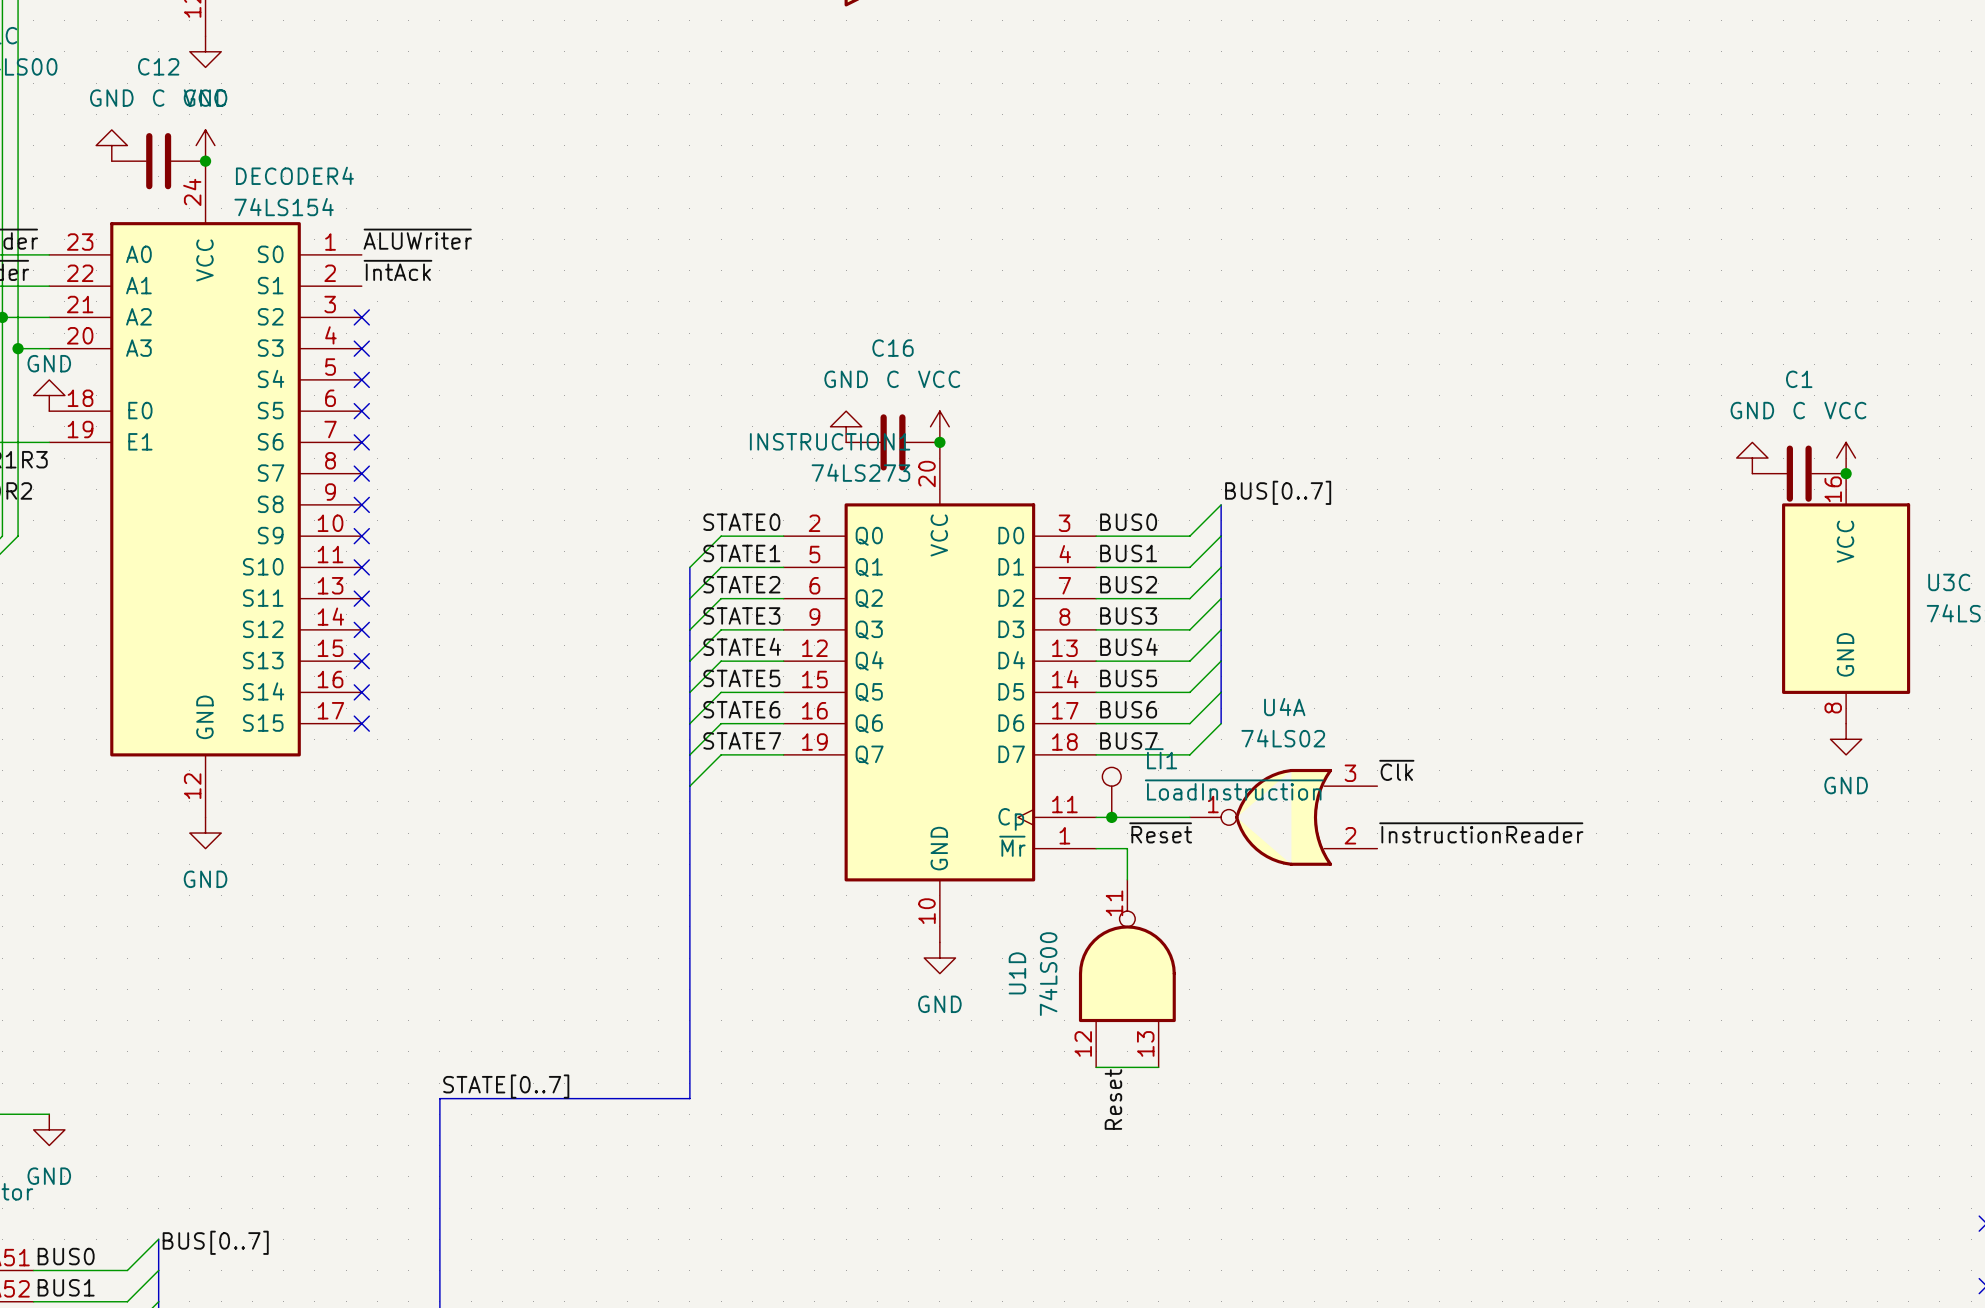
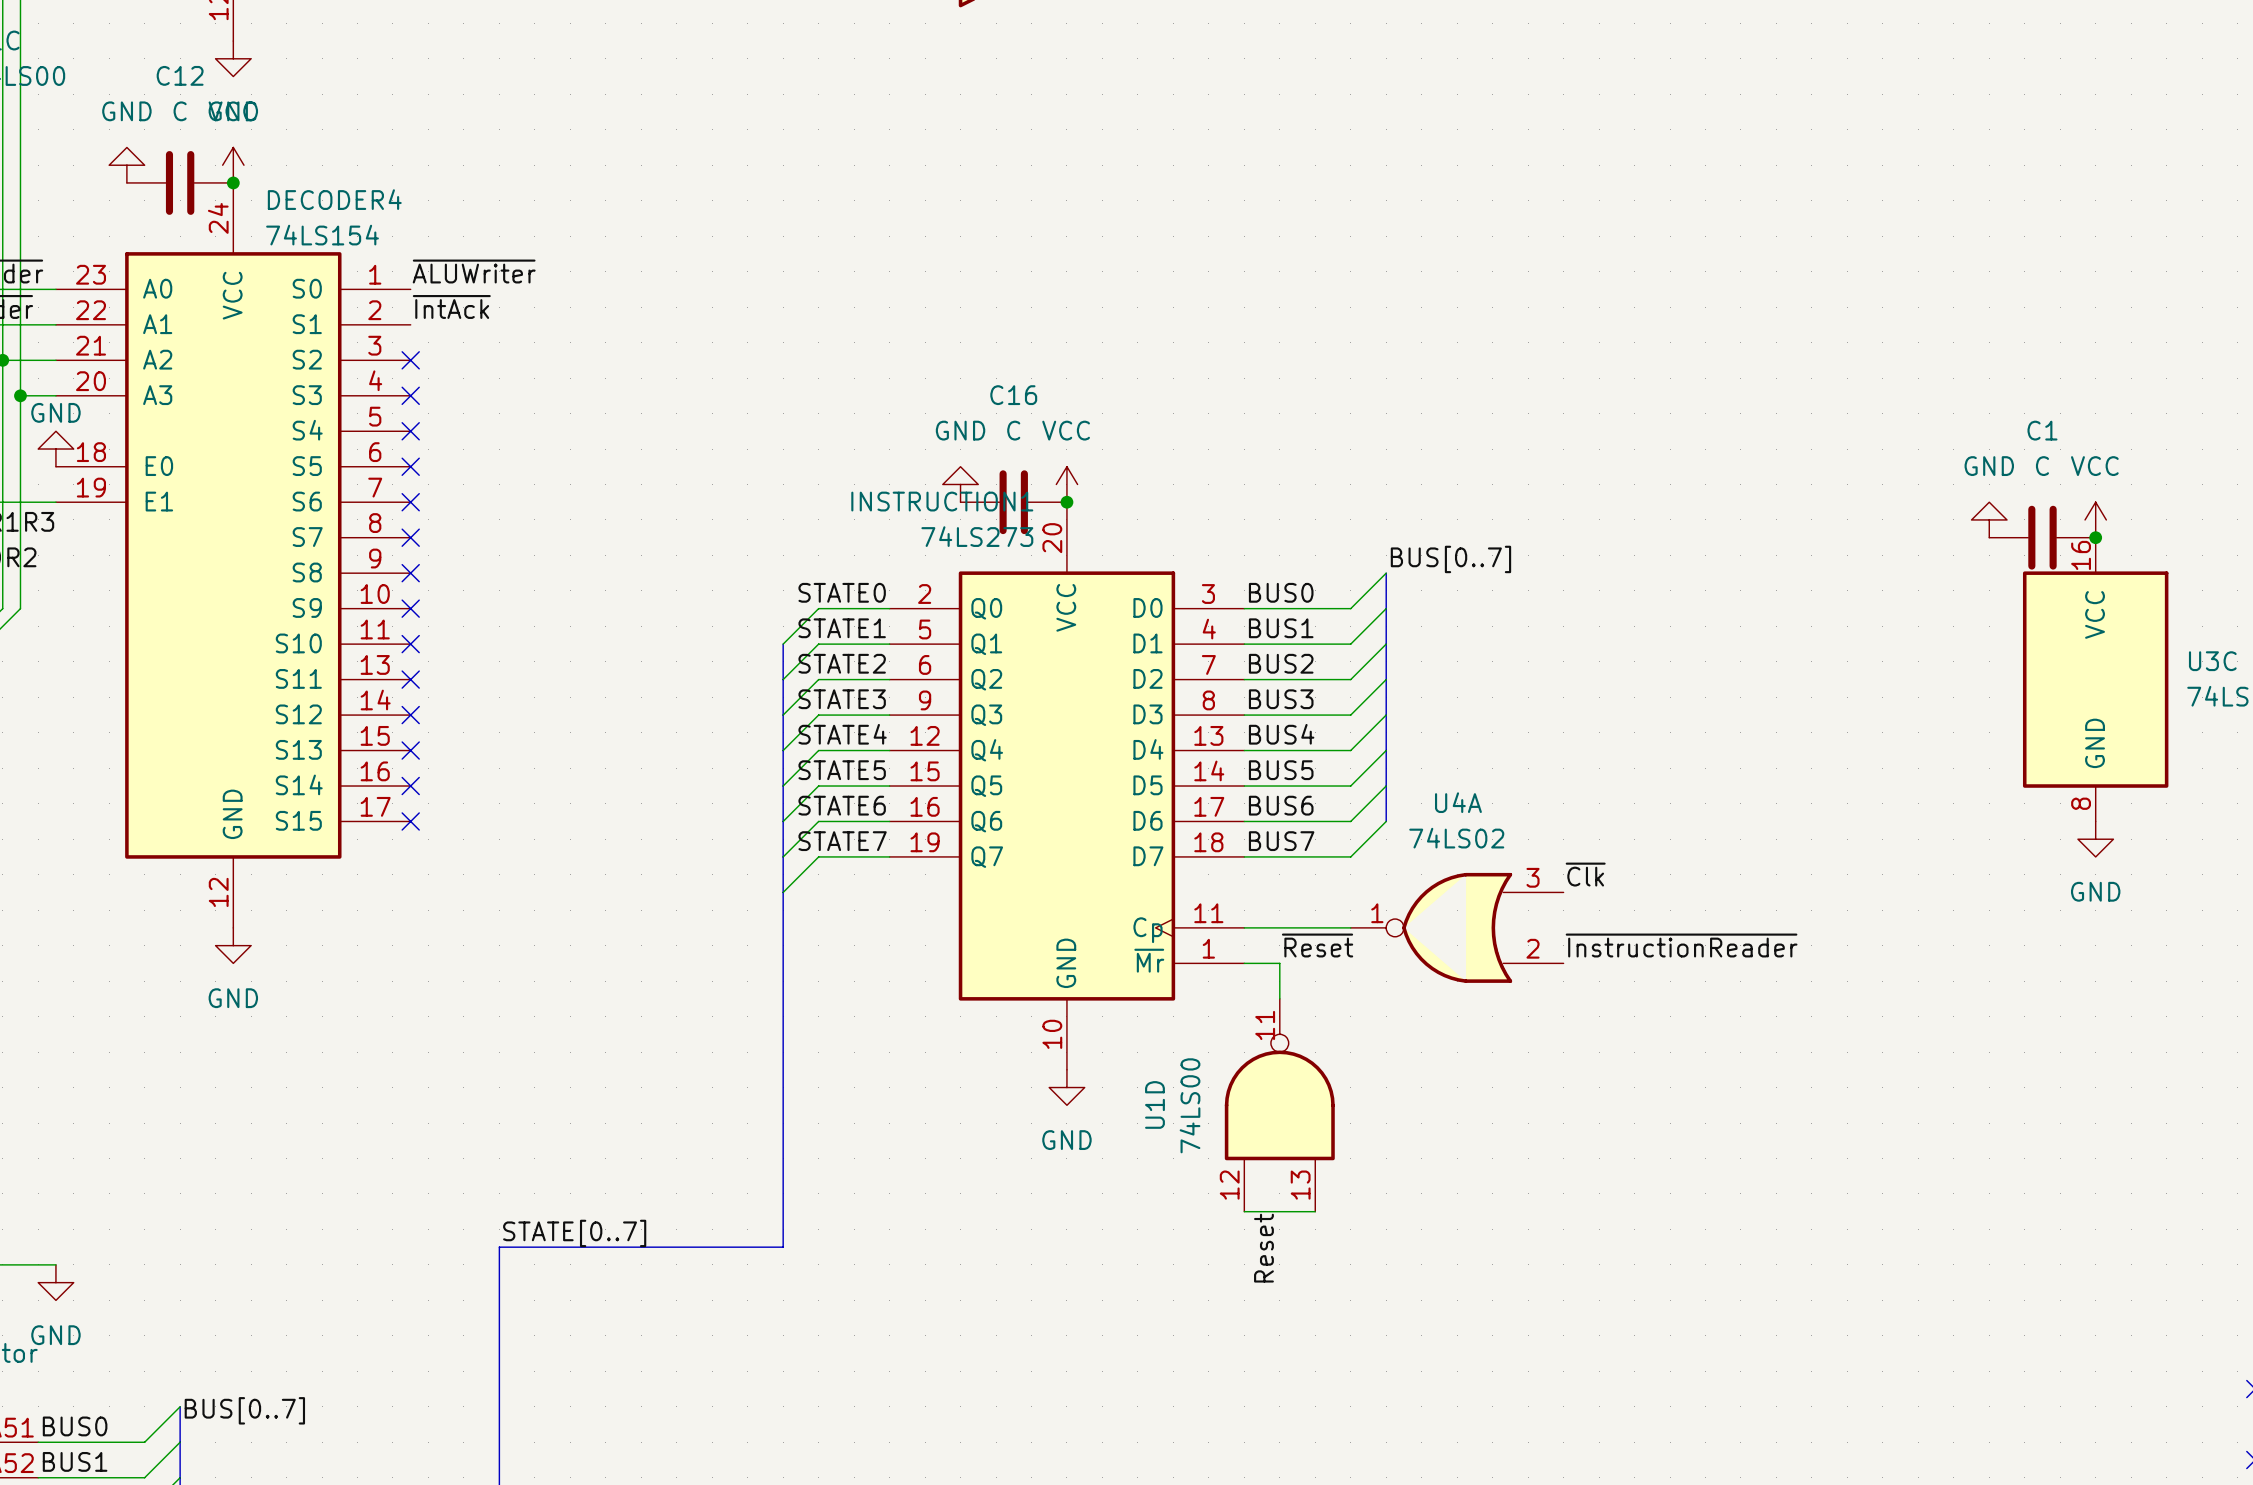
~{LI}1: ~{LoadInstruction} (1111, 792) -> none
junction: (1111, 817) -> none

